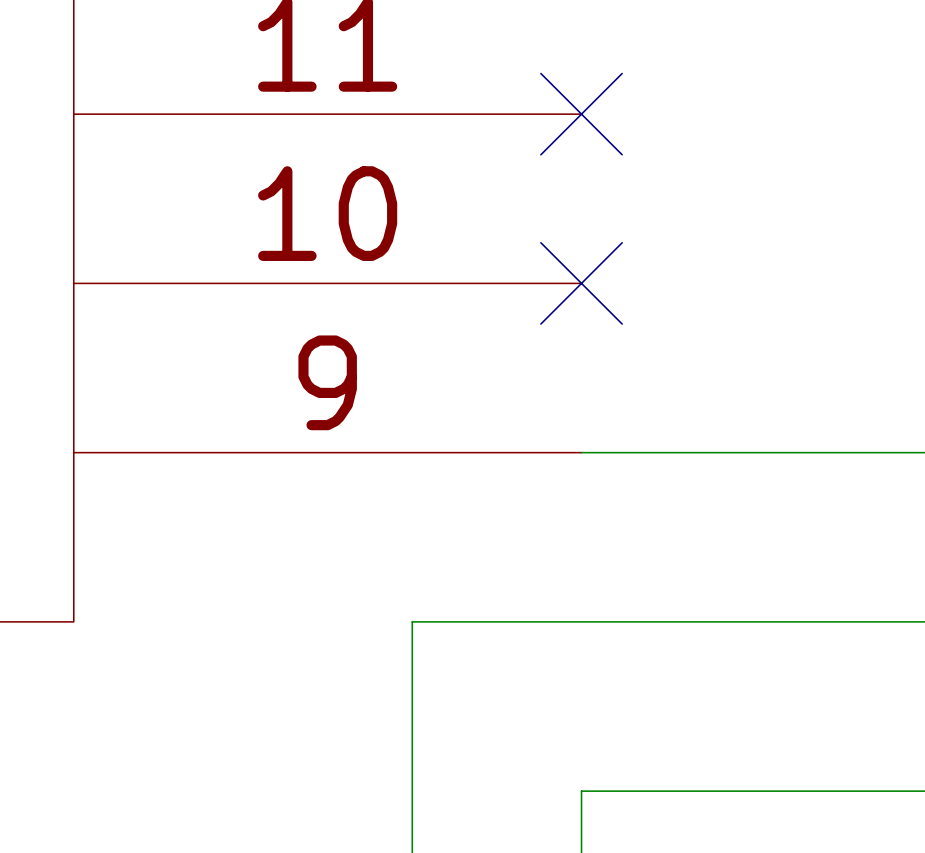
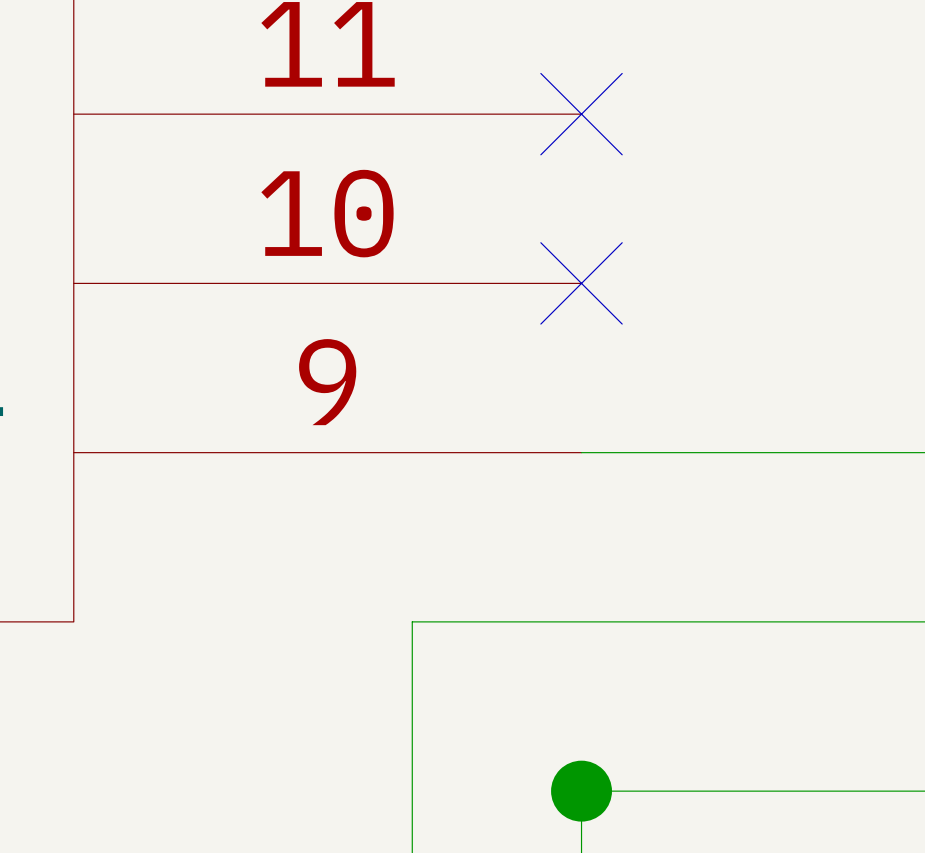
junction: none -> (581, 791)

